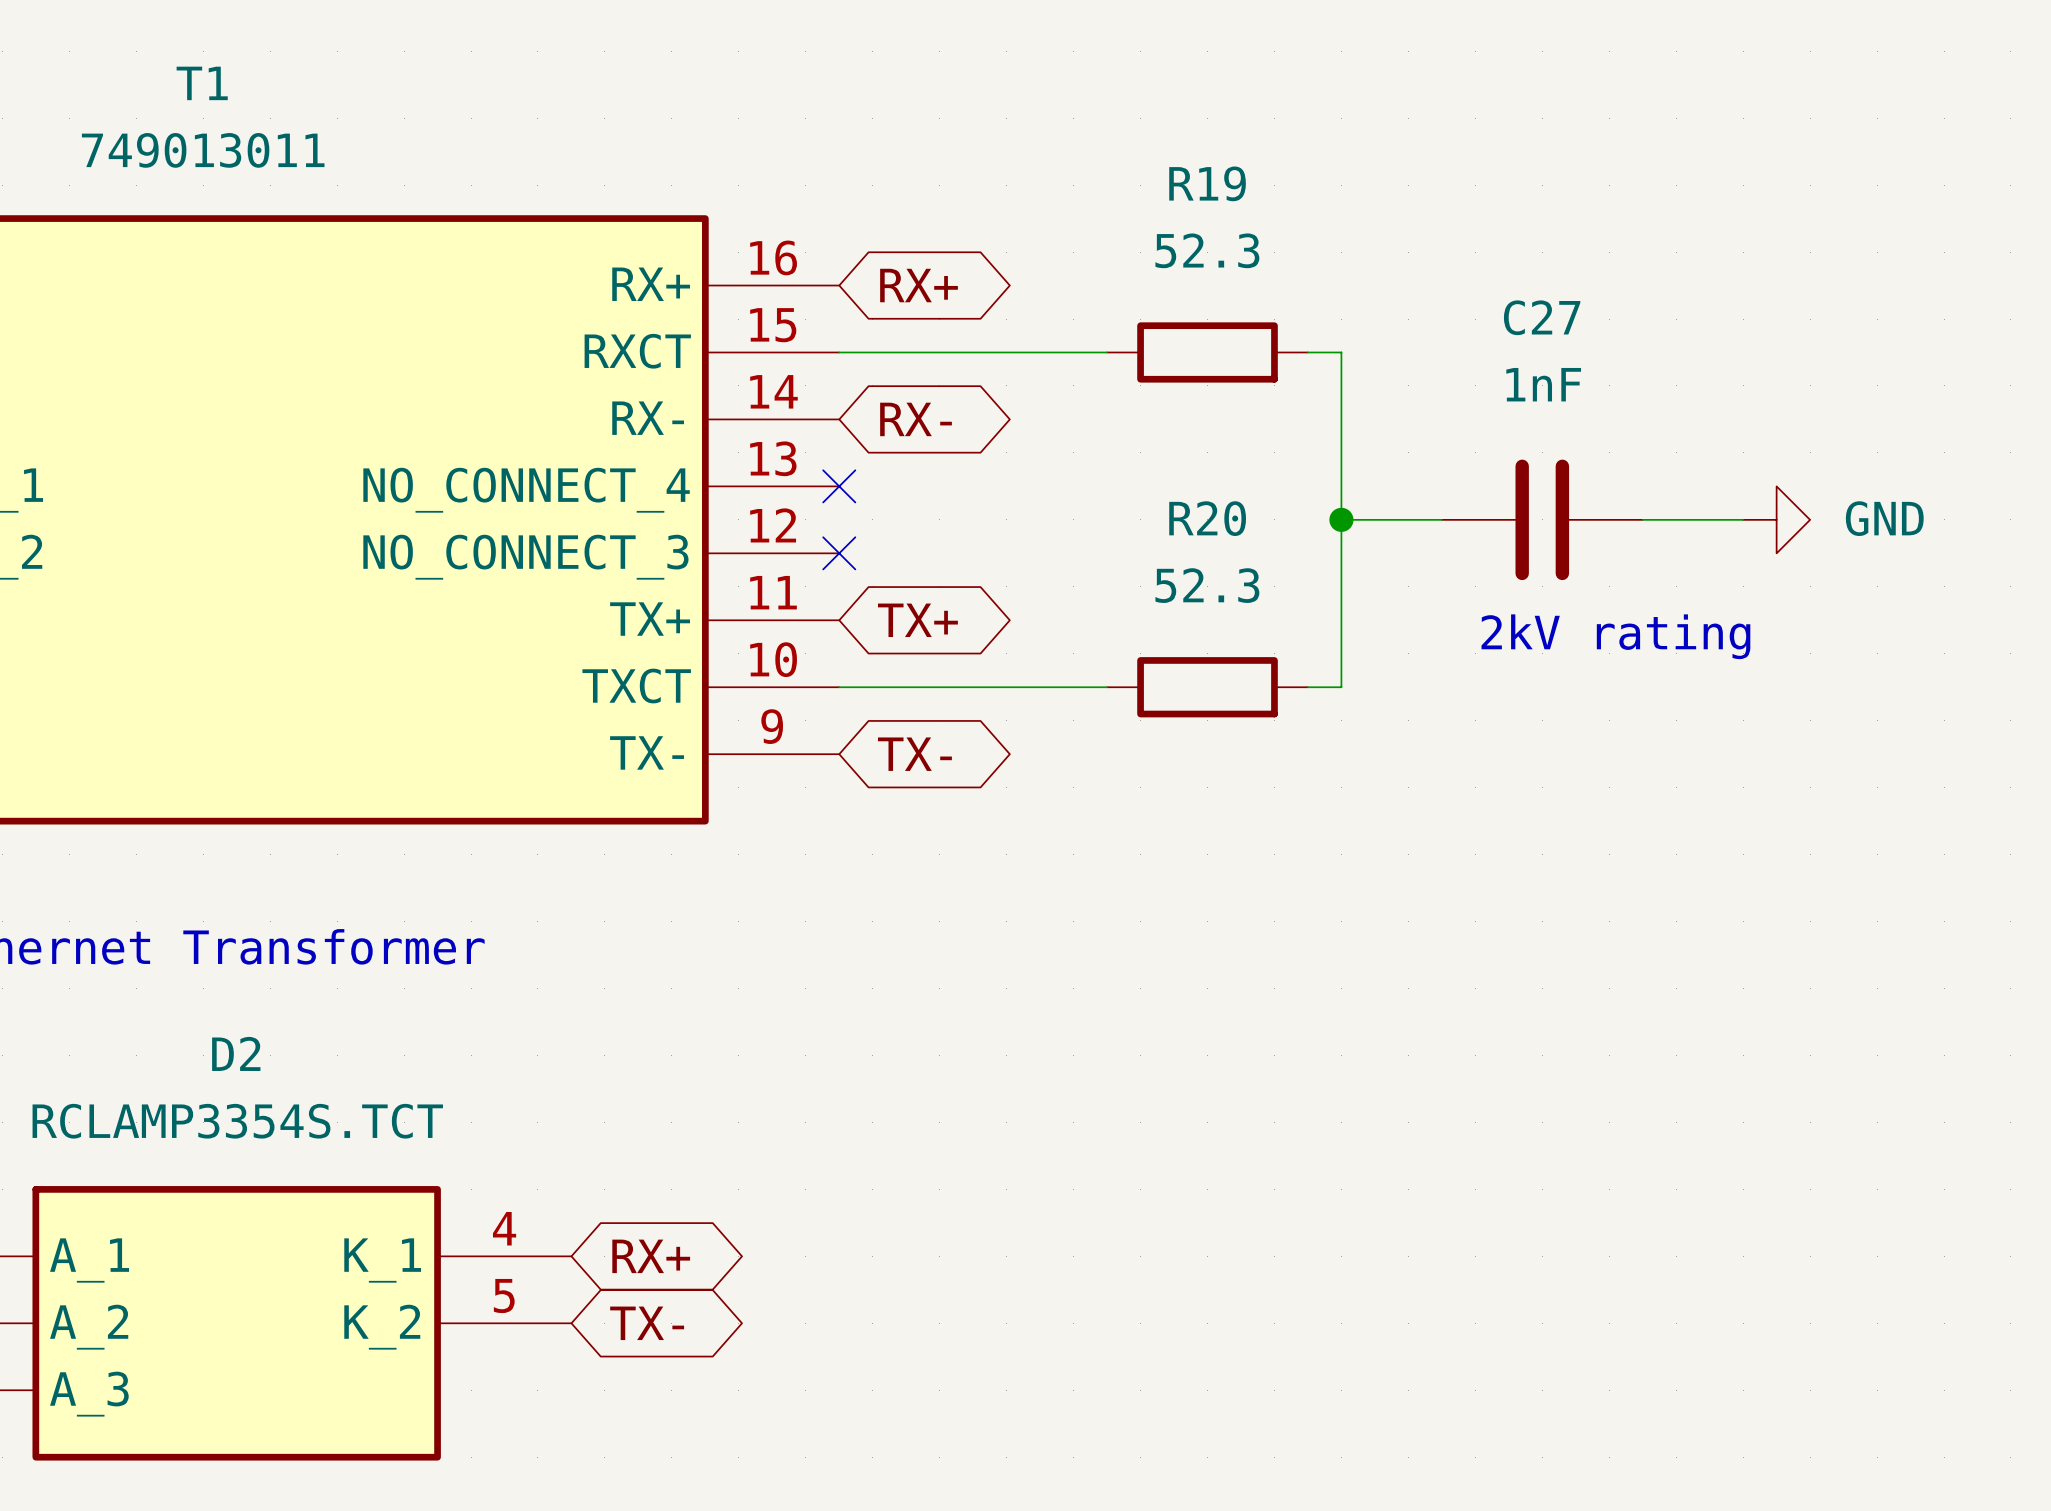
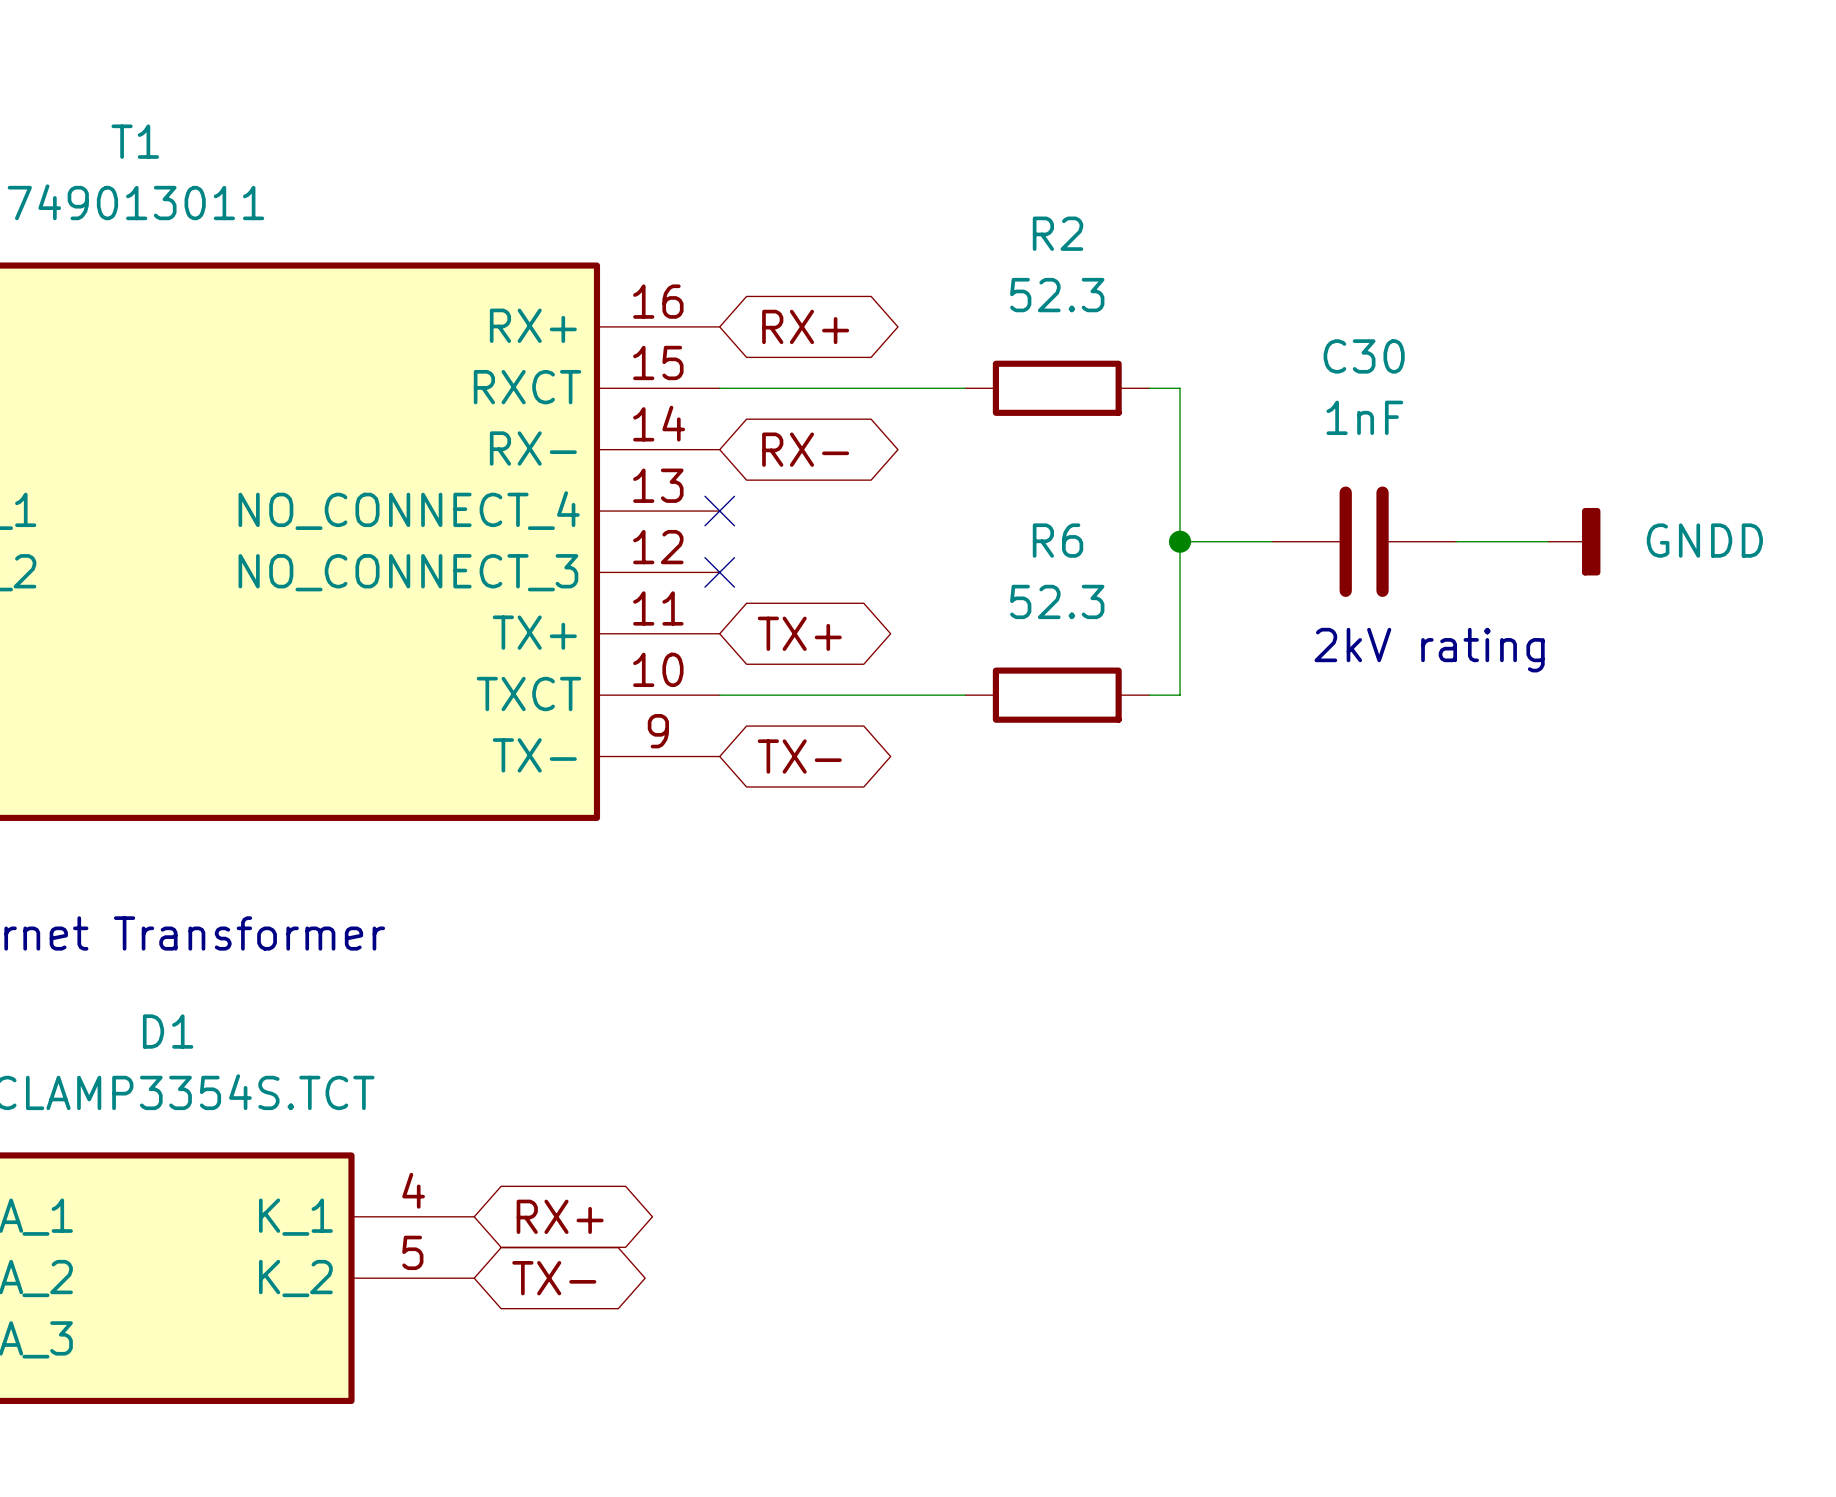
R19 name: R19 (1207, 183) -> R2 (1058, 233)
C27 name: C27 (1542, 317) -> C30 (1364, 356)
R20 name: R20 (1207, 518) -> R6 (1058, 540)
power symbol: GND (1776, 519) -> GNDD (1574, 541)
D2 name: D2 (236, 1053) -> D1 (168, 1031)

